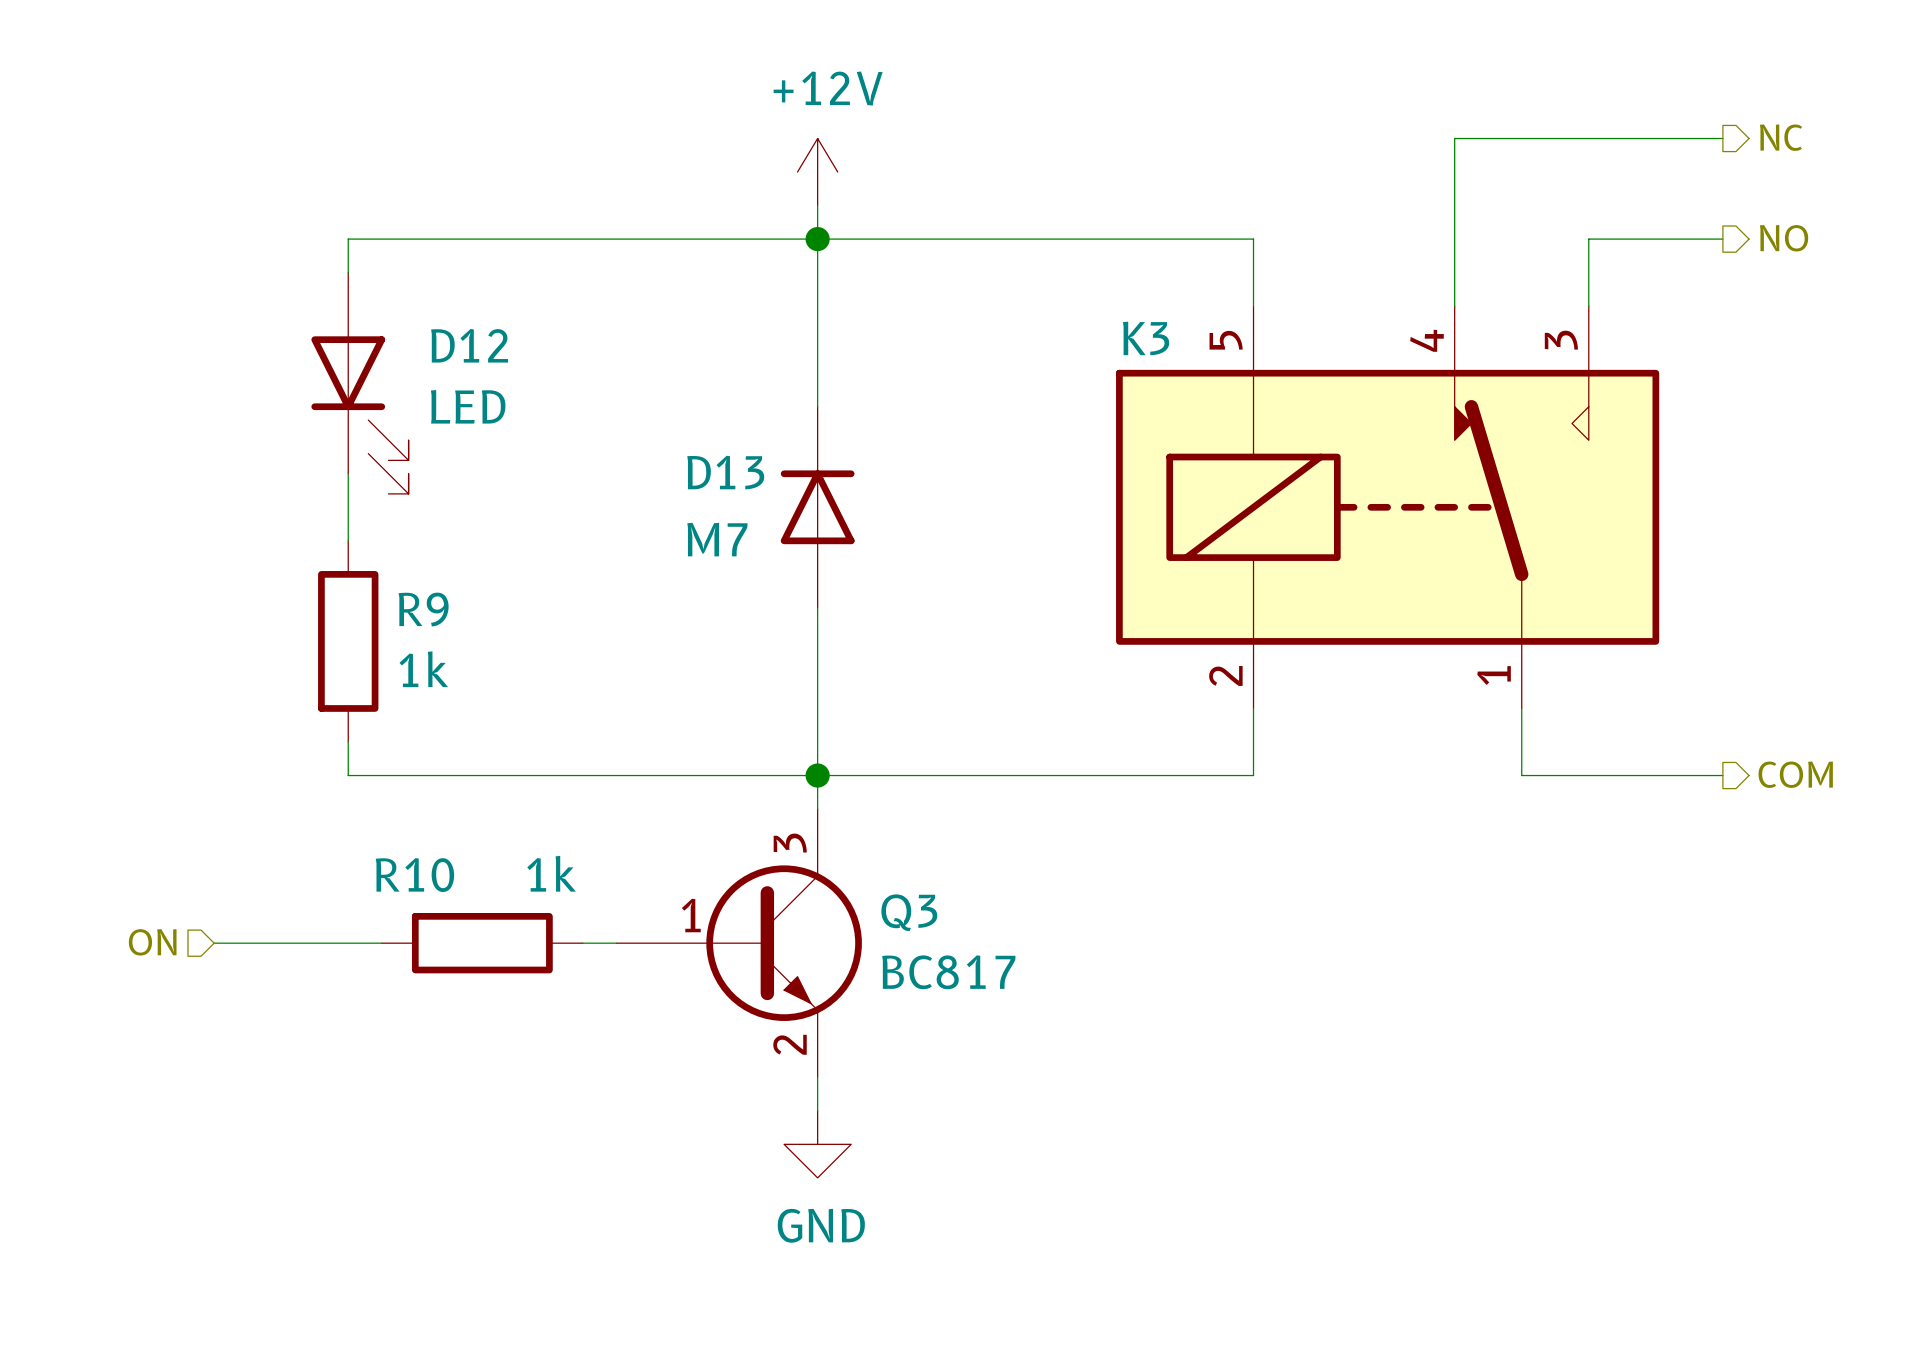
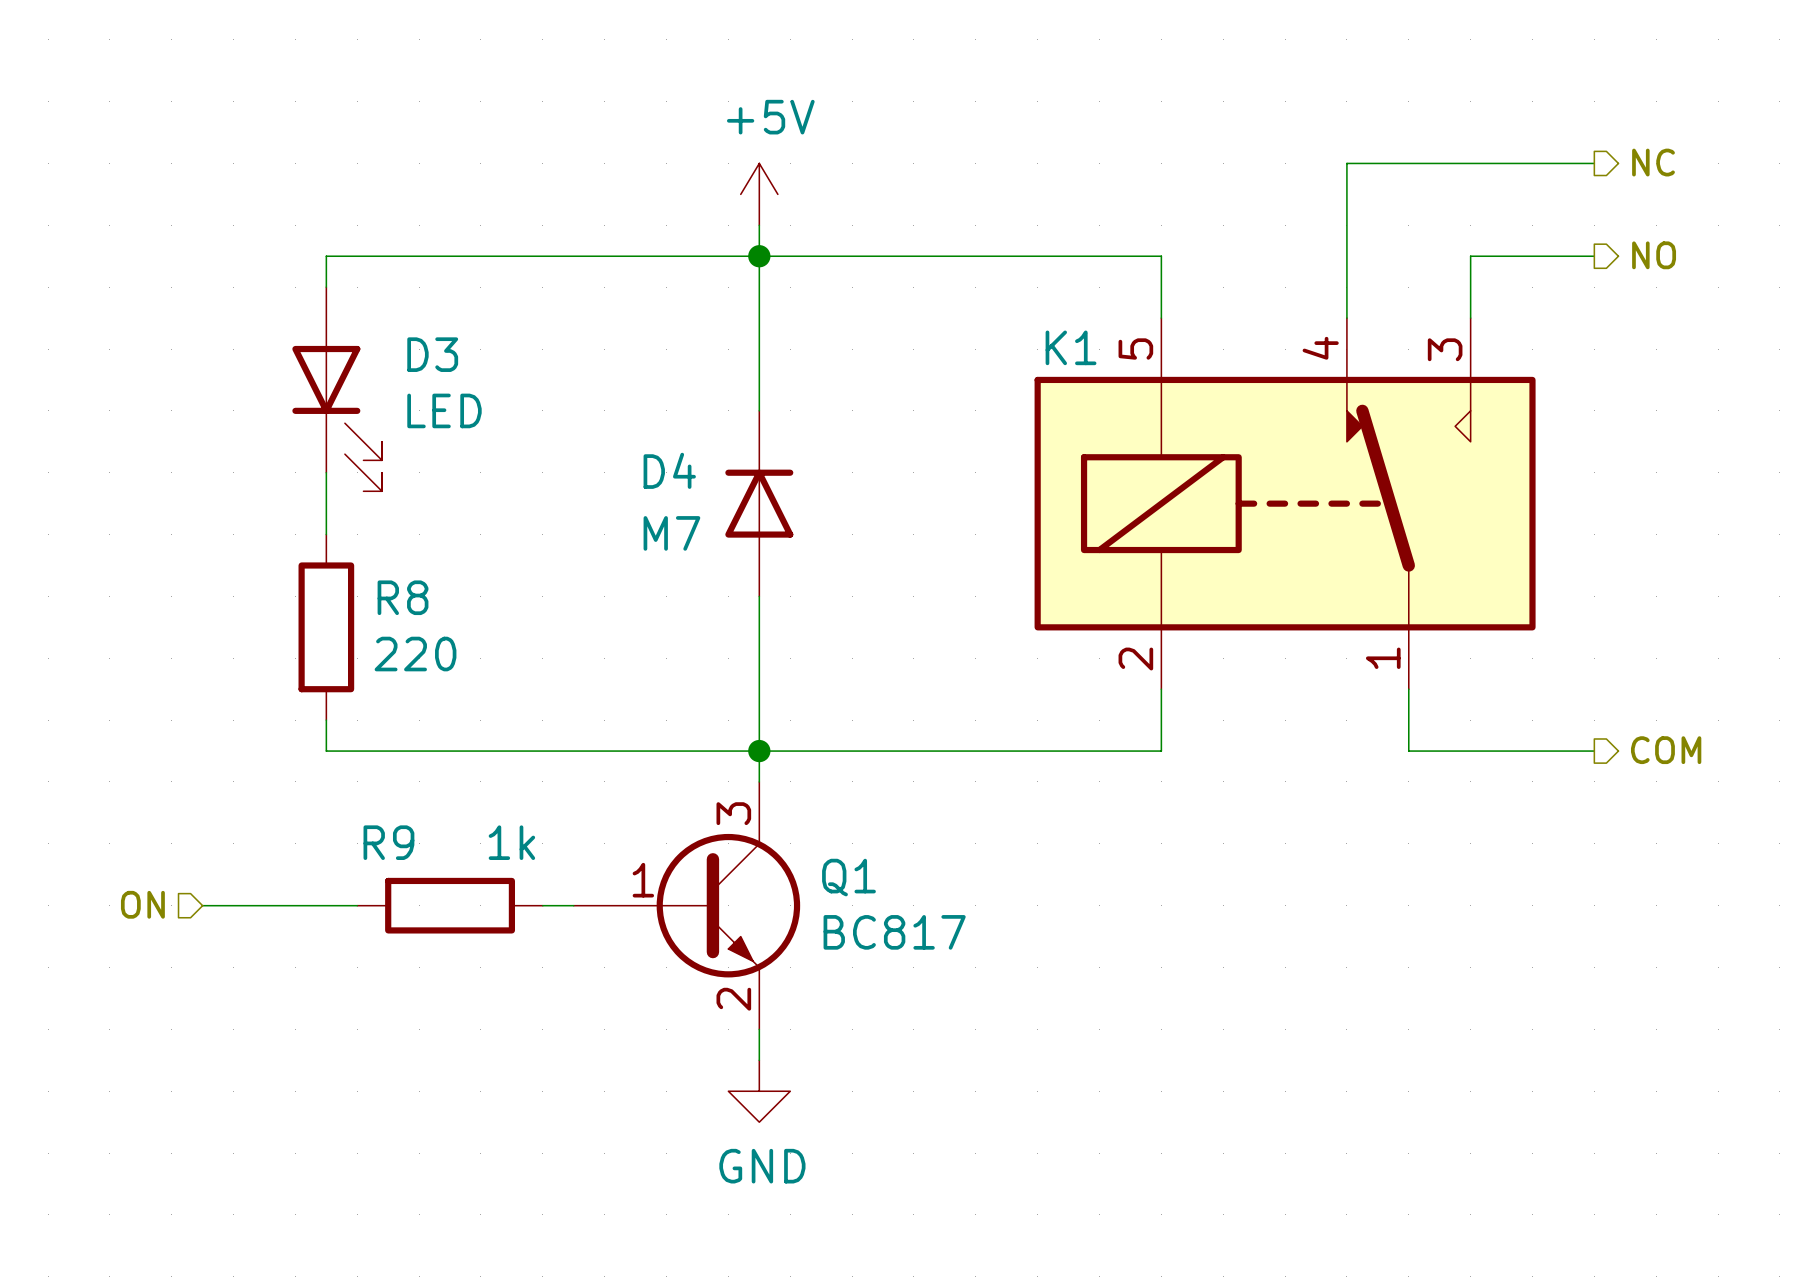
power symbol: +12V (817, 172) -> +5V (759, 194)
K3 name: K3 (1146, 338) -> K1 (1071, 347)
D12 name: D12 (469, 345) -> D3 (432, 354)
D13 name: D13 (725, 472) -> D4 (669, 470)
R9 name: R9 (423, 609) -> R8 (403, 597)
R9 value: 1k (423, 669) -> 220 (415, 654)
R10 name: R10 (414, 875) -> R9 (388, 842)
Q3 name: Q3 (909, 912) -> Q1 (848, 877)

